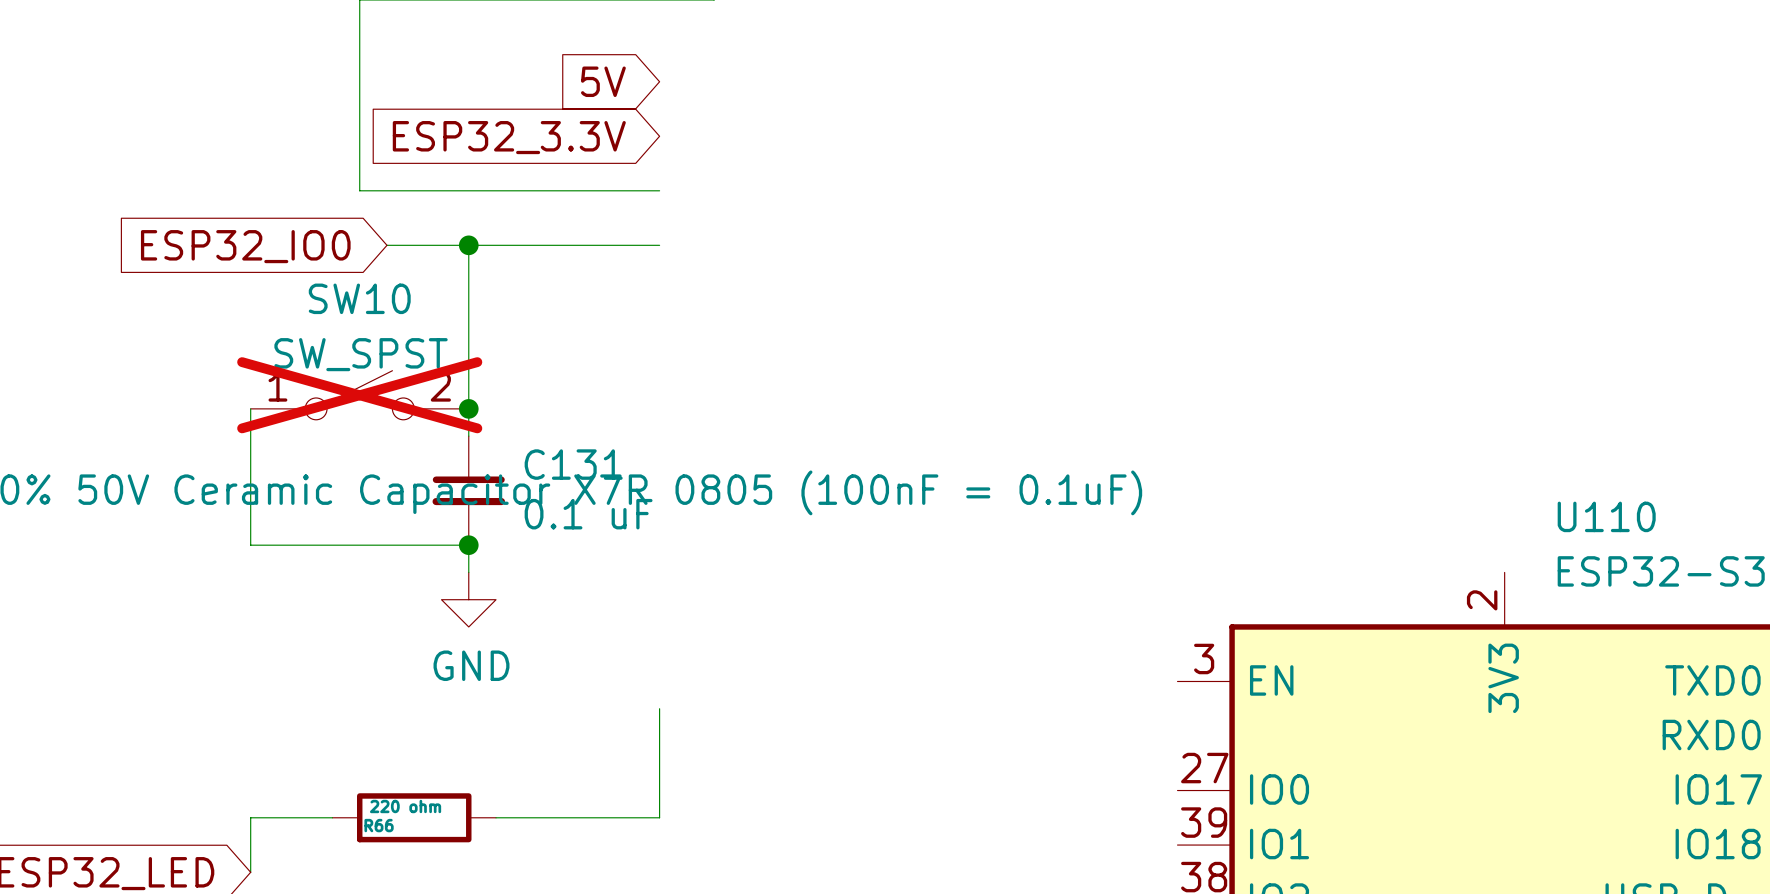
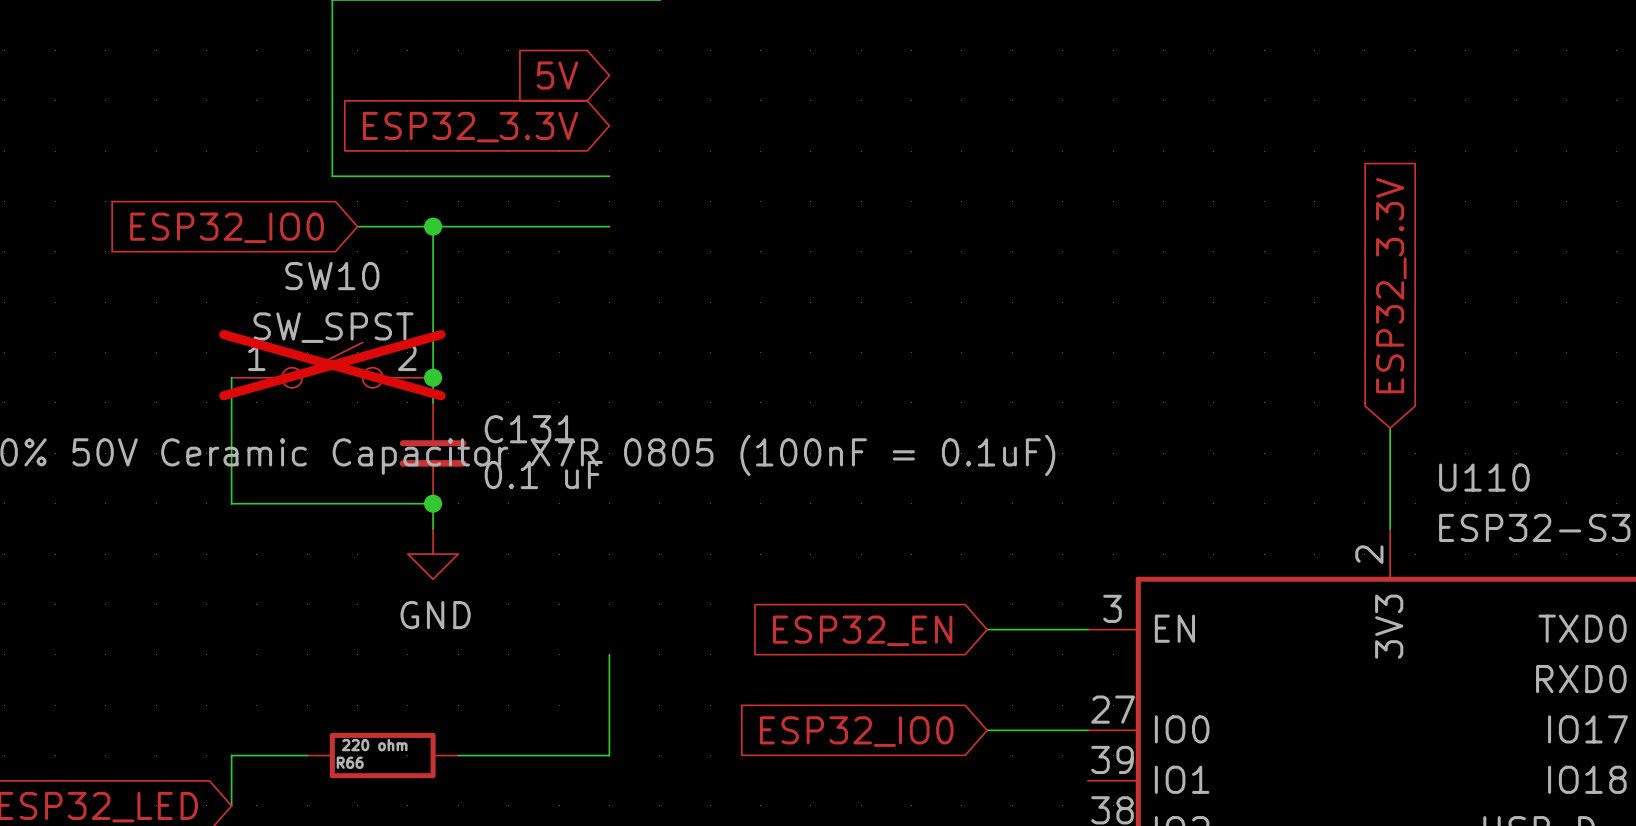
global label: none -> ESP32_3.3V (1391, 285)
wire: none -> (1390, 428) (1390, 528)
wire: none -> (987, 629) (1087, 629)
global label: none -> ESP32_EN (862, 630)
wire: none -> (987, 730) (1087, 730)
global label: none -> ESP32_IO0 (856, 731)

